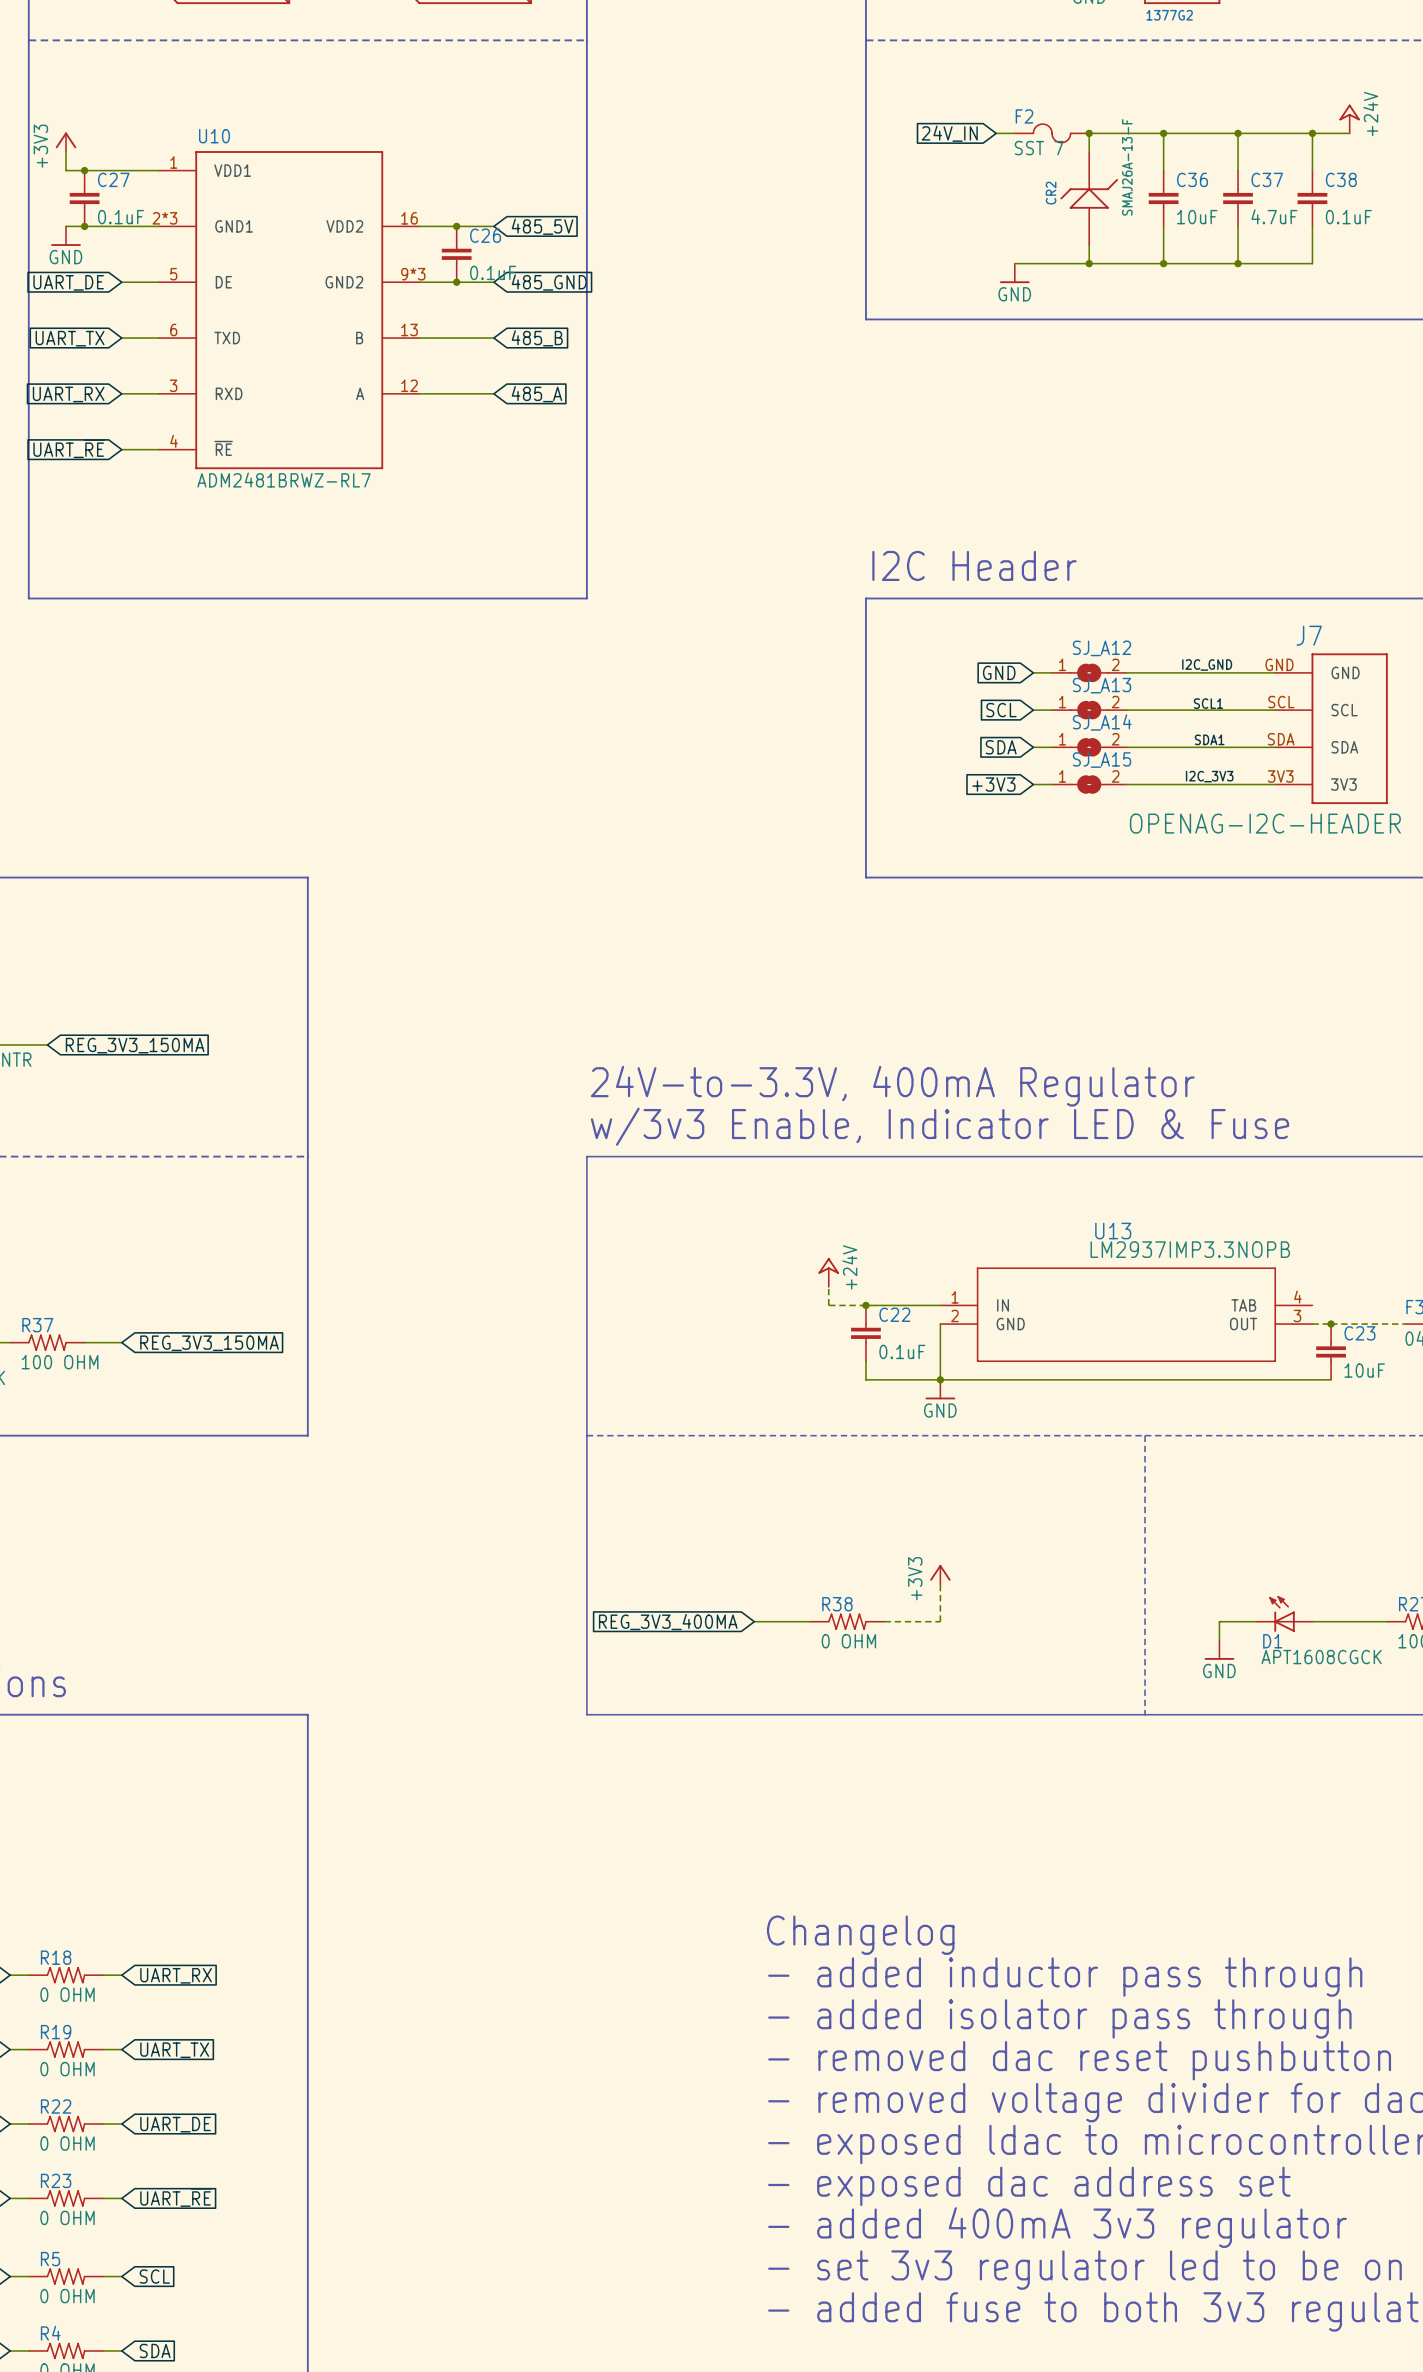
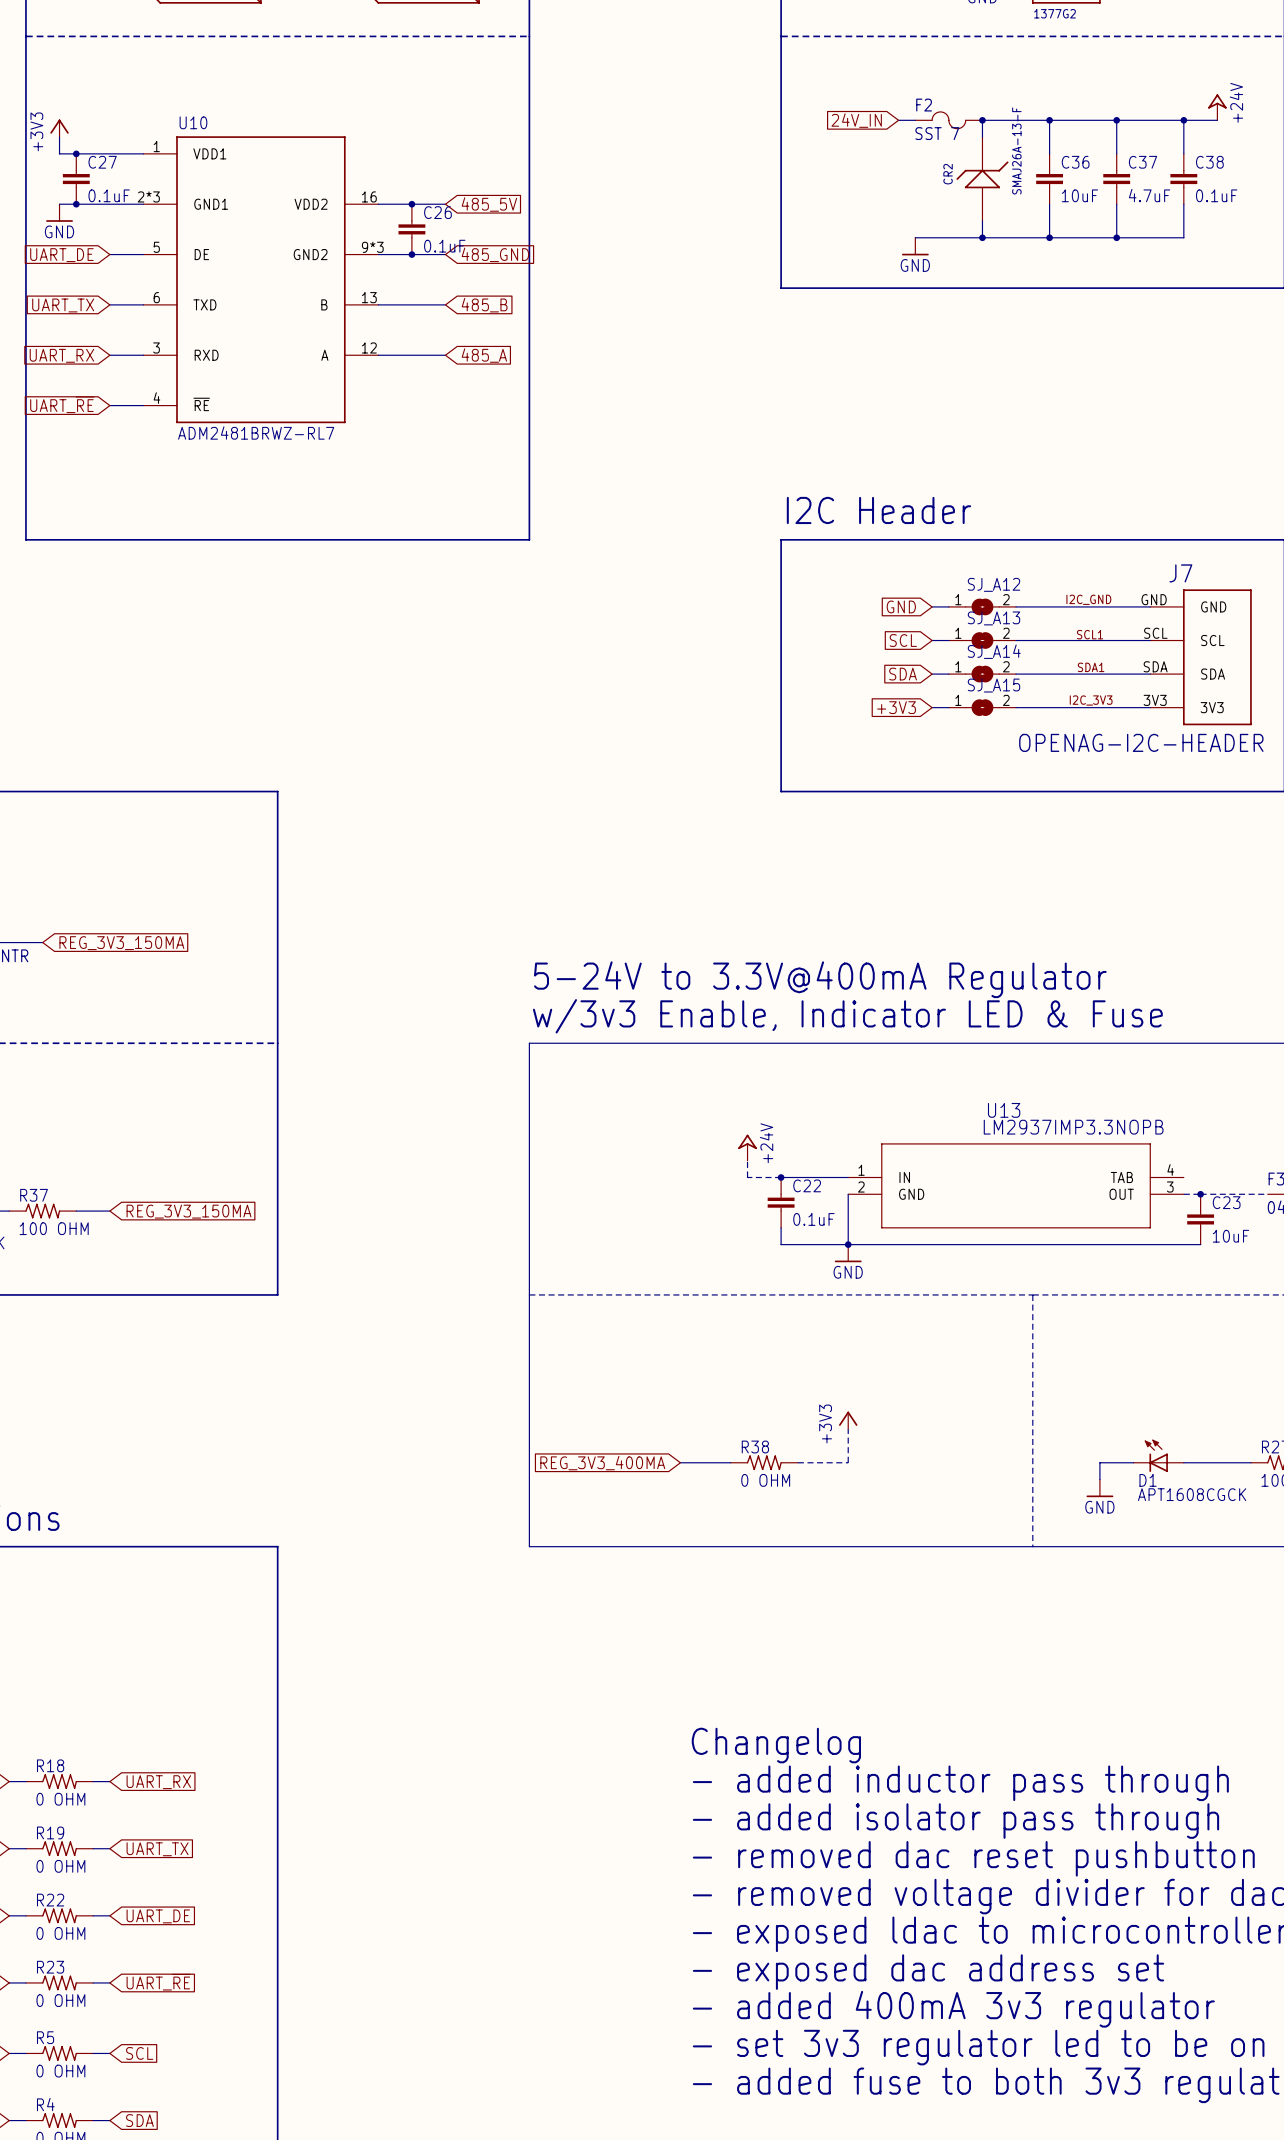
text: 24V-to-3.3V, 400mA Regulator (892, 1086) -> 5-24V to 3.3V@400mA Regulator (820, 979)

